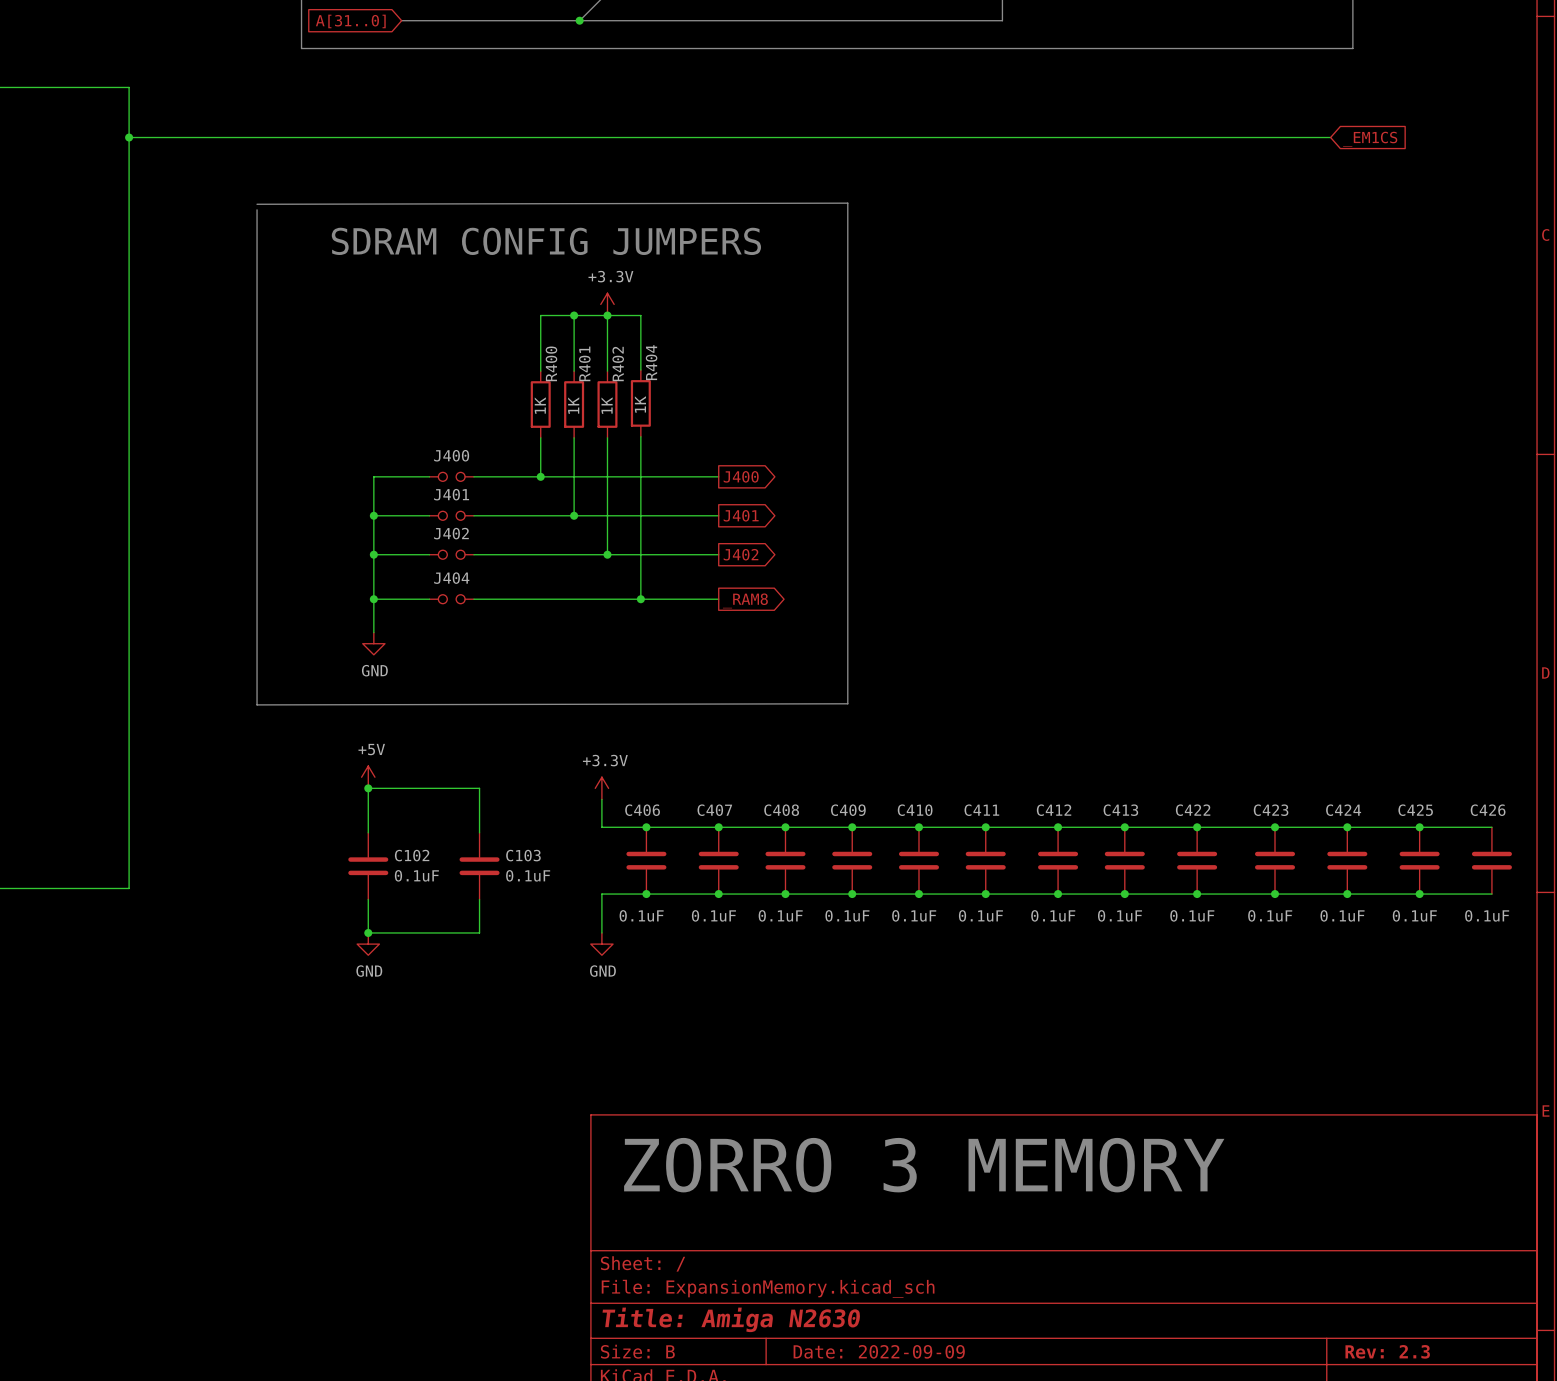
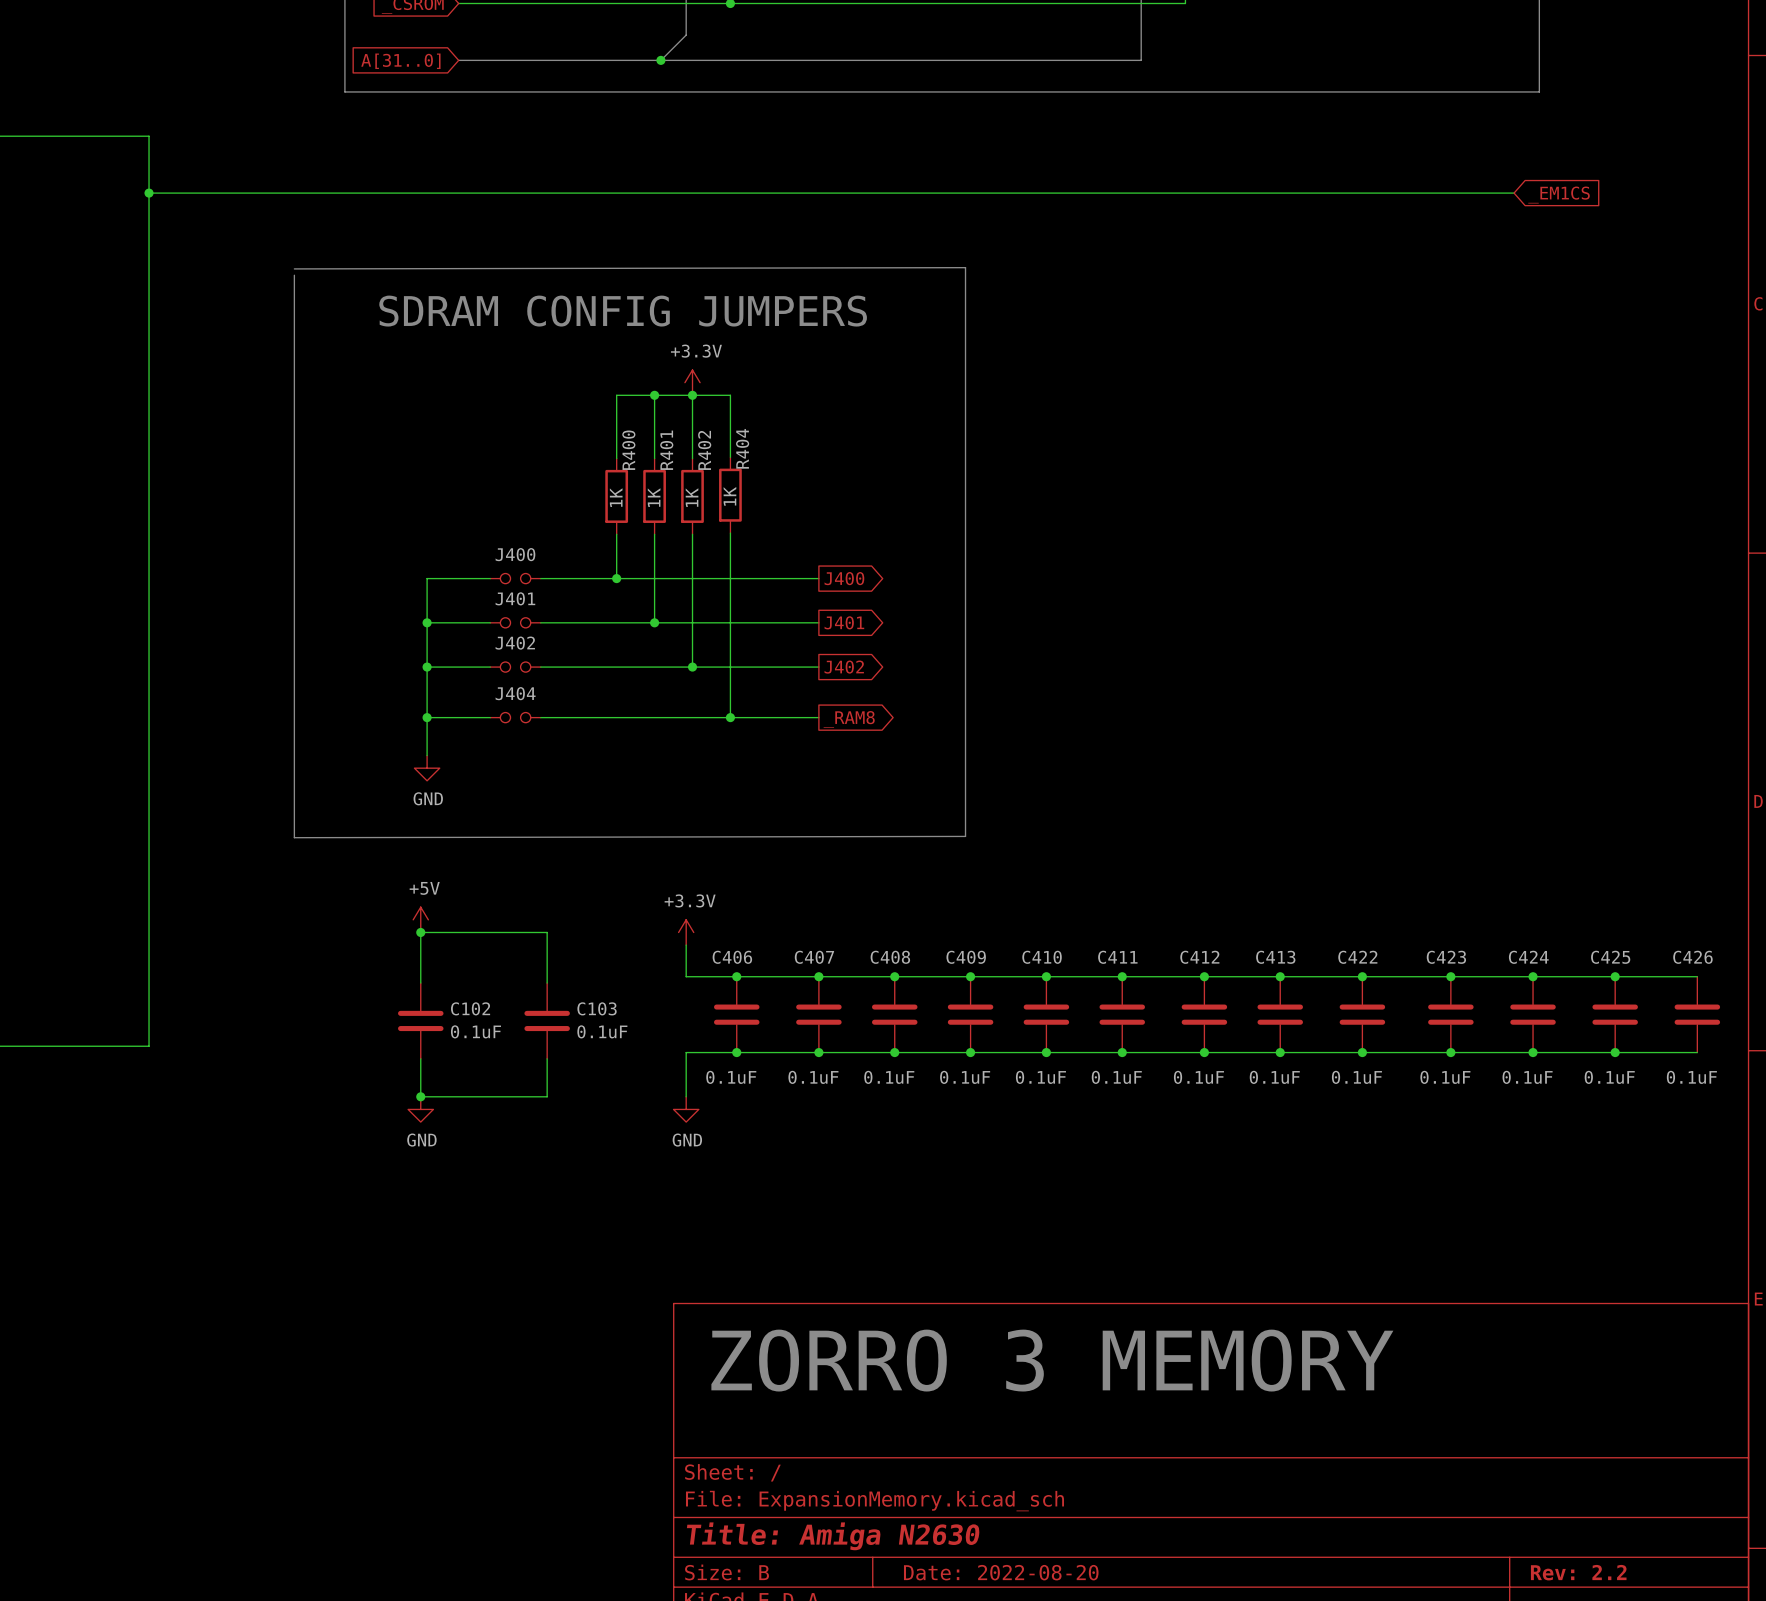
title block: Date: 2022-09-09 (879, 1351) -> Date: 2022-08-20 (1001, 1572)
title block: Rev: 2.3 (1387, 1351) -> Rev: 2.2 (1578, 1572)

